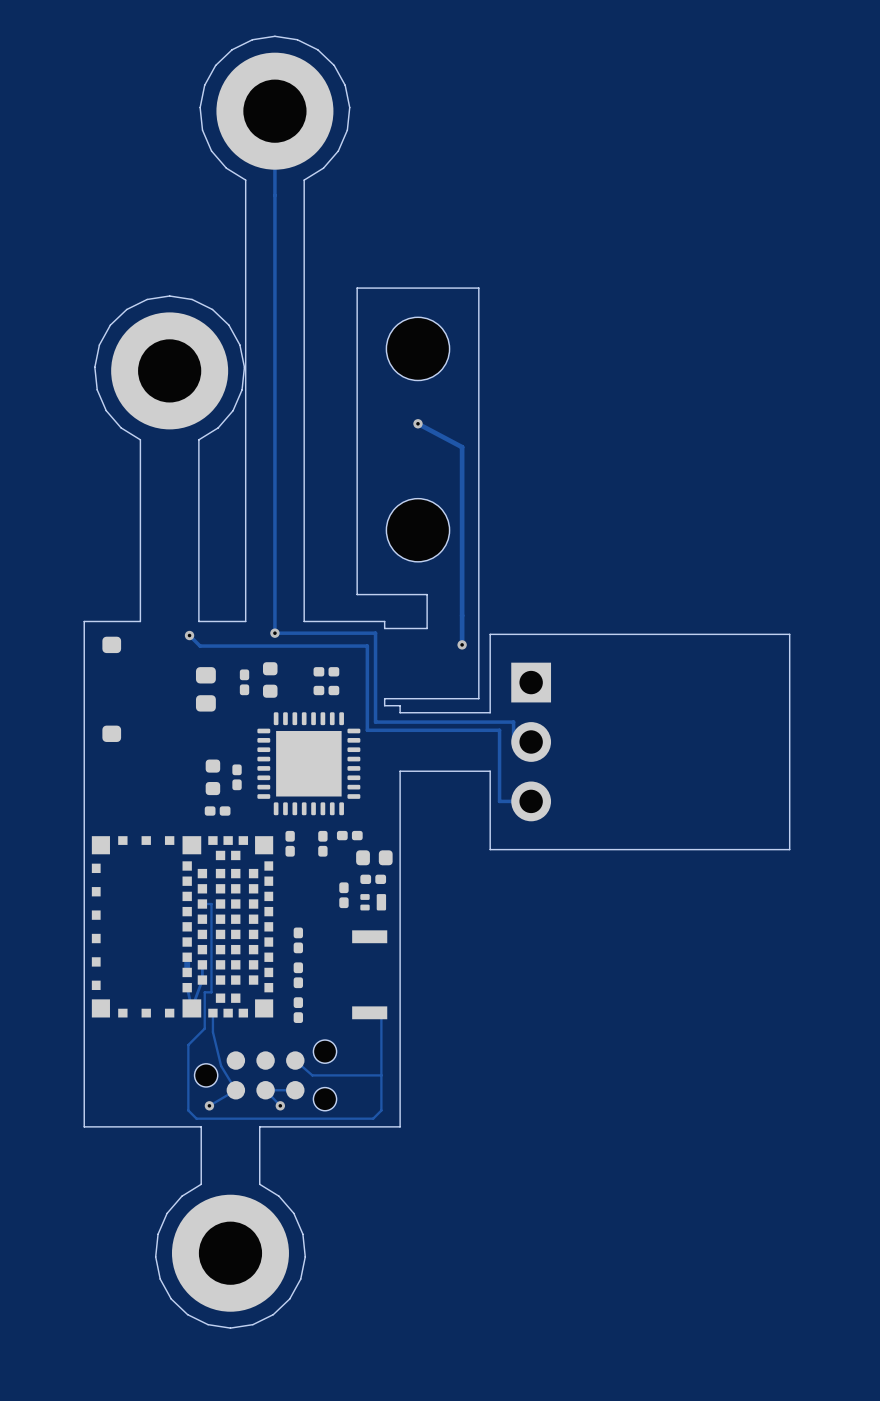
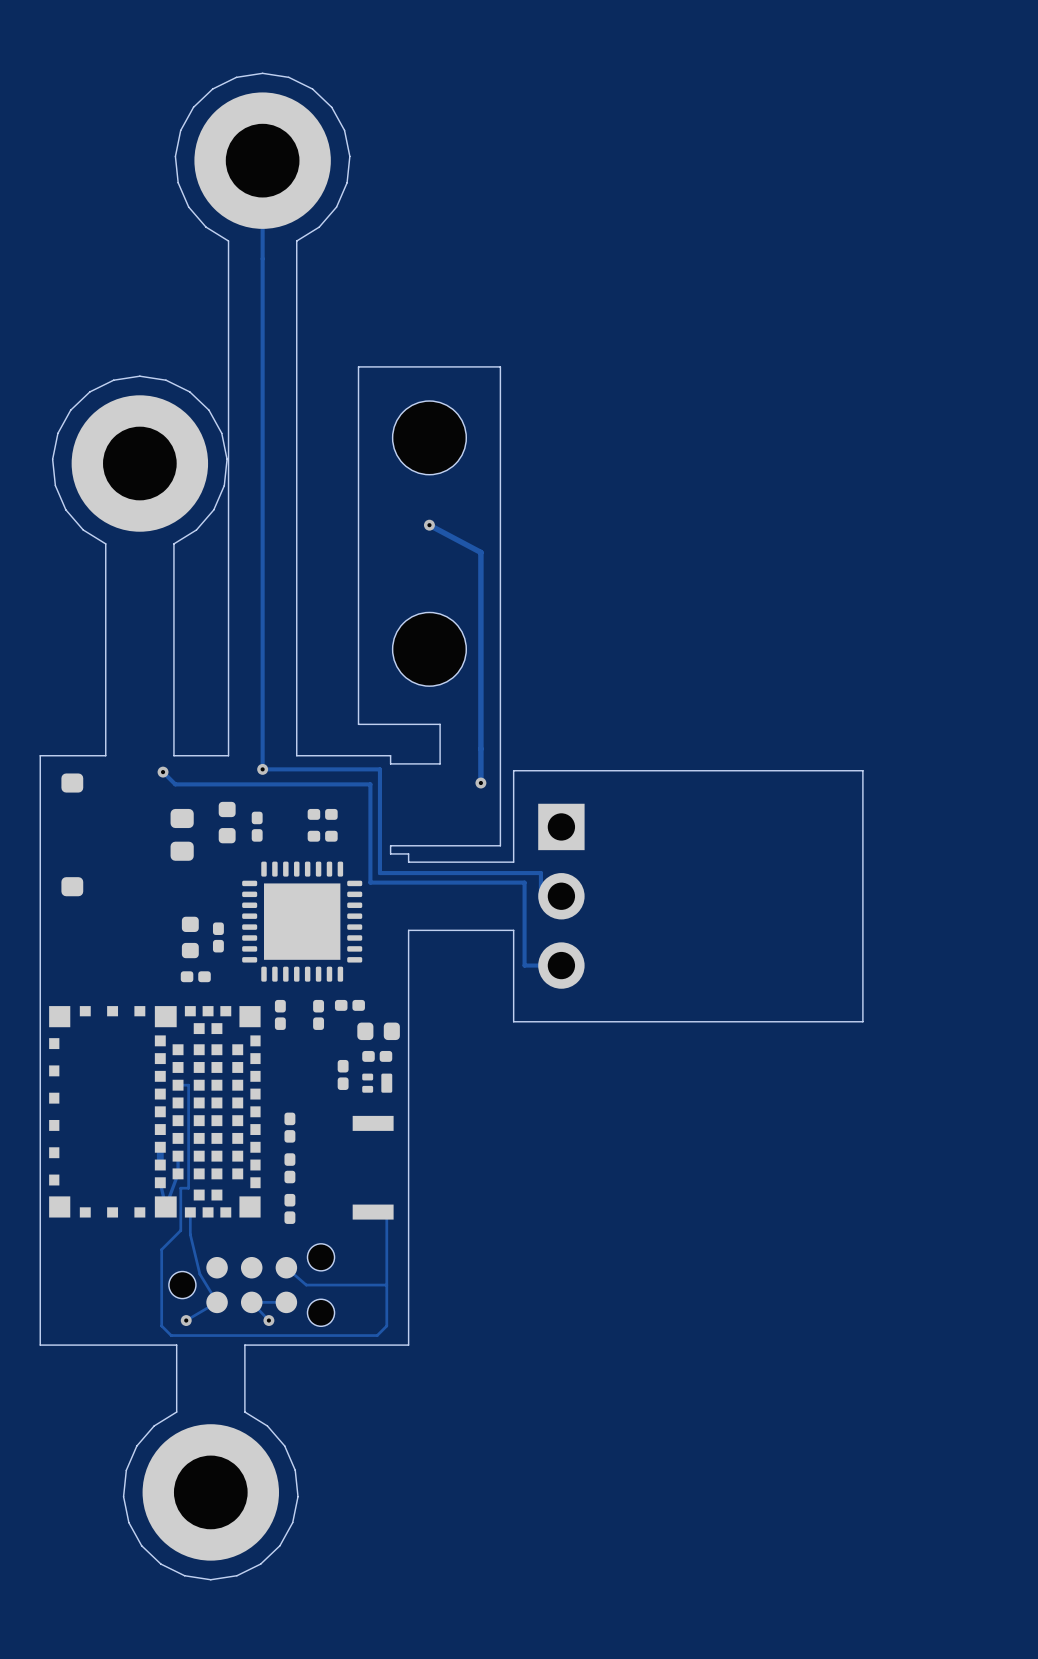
part footprint: [263, 662, 278, 698] -> [251, 811, 263, 842]
part footprint: [239, 669, 250, 696] -> [218, 801, 236, 844]

